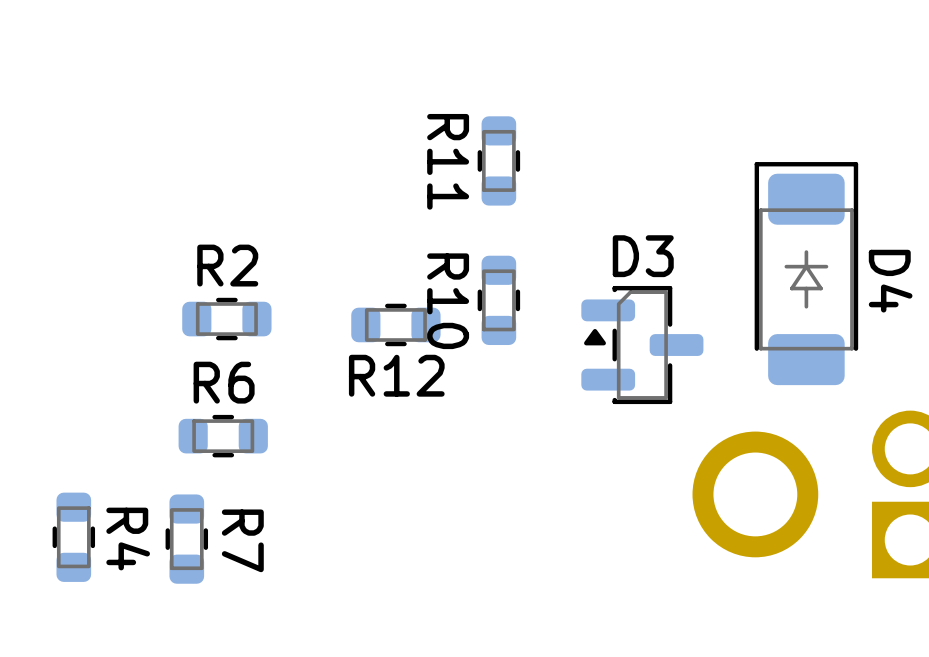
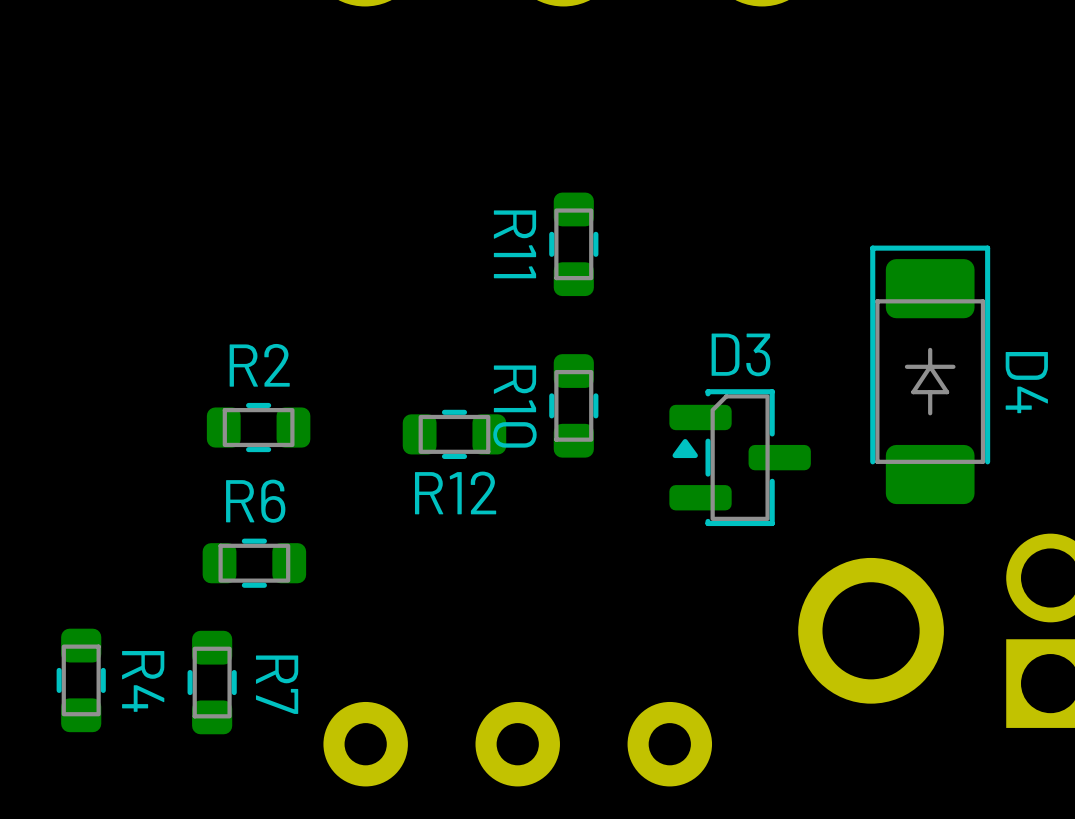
part: none -> (365, 744)
part: none -> (517, 744)
part: none -> (669, 744)

